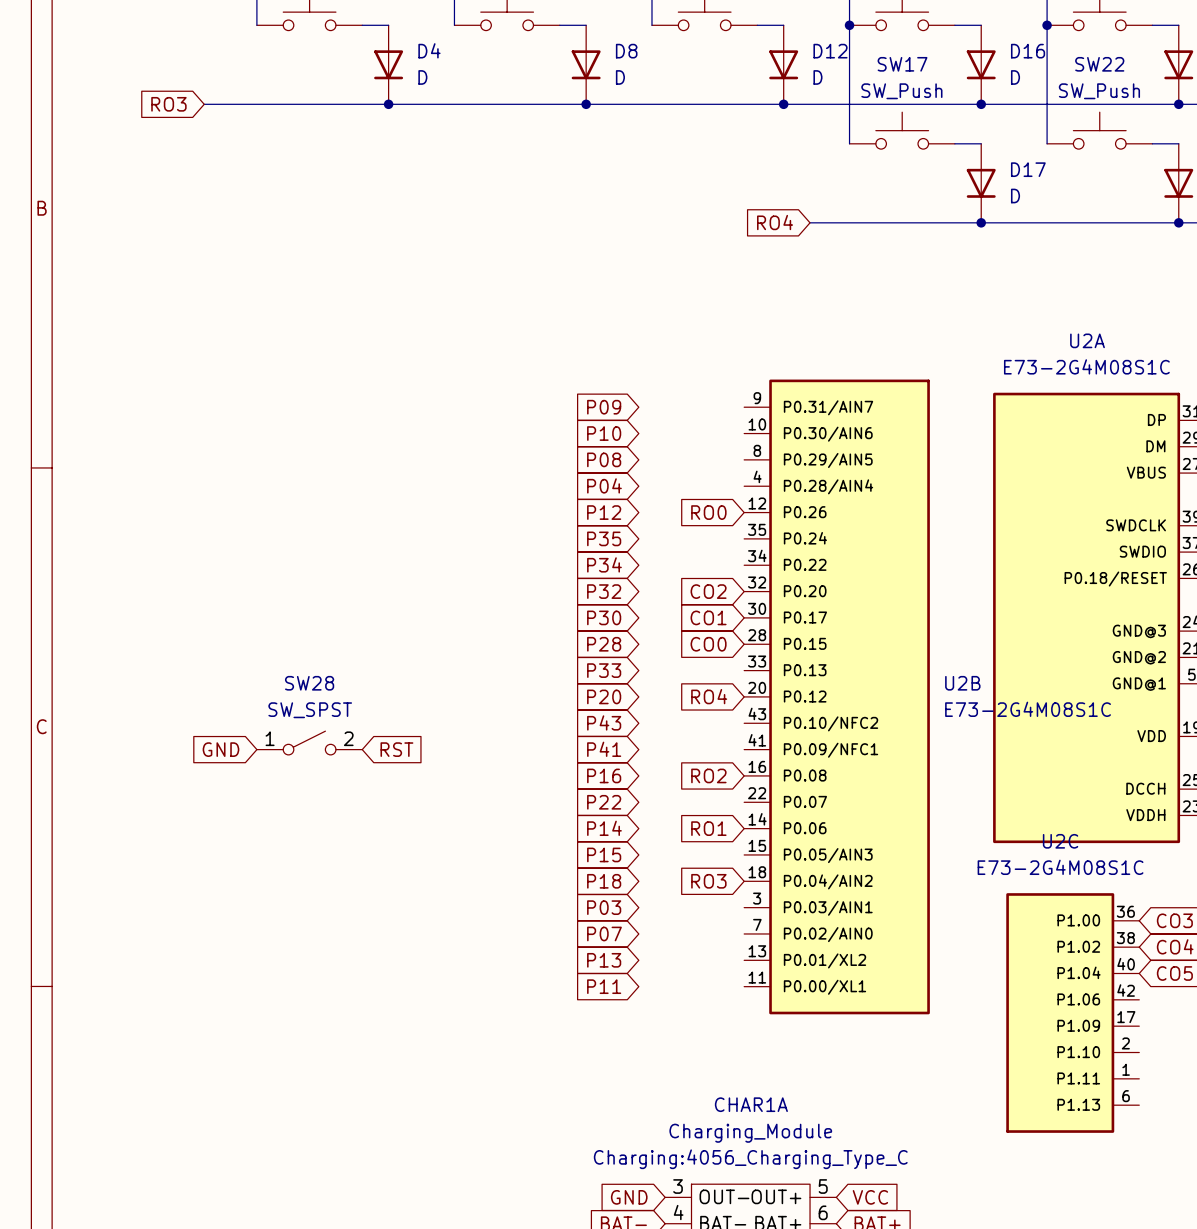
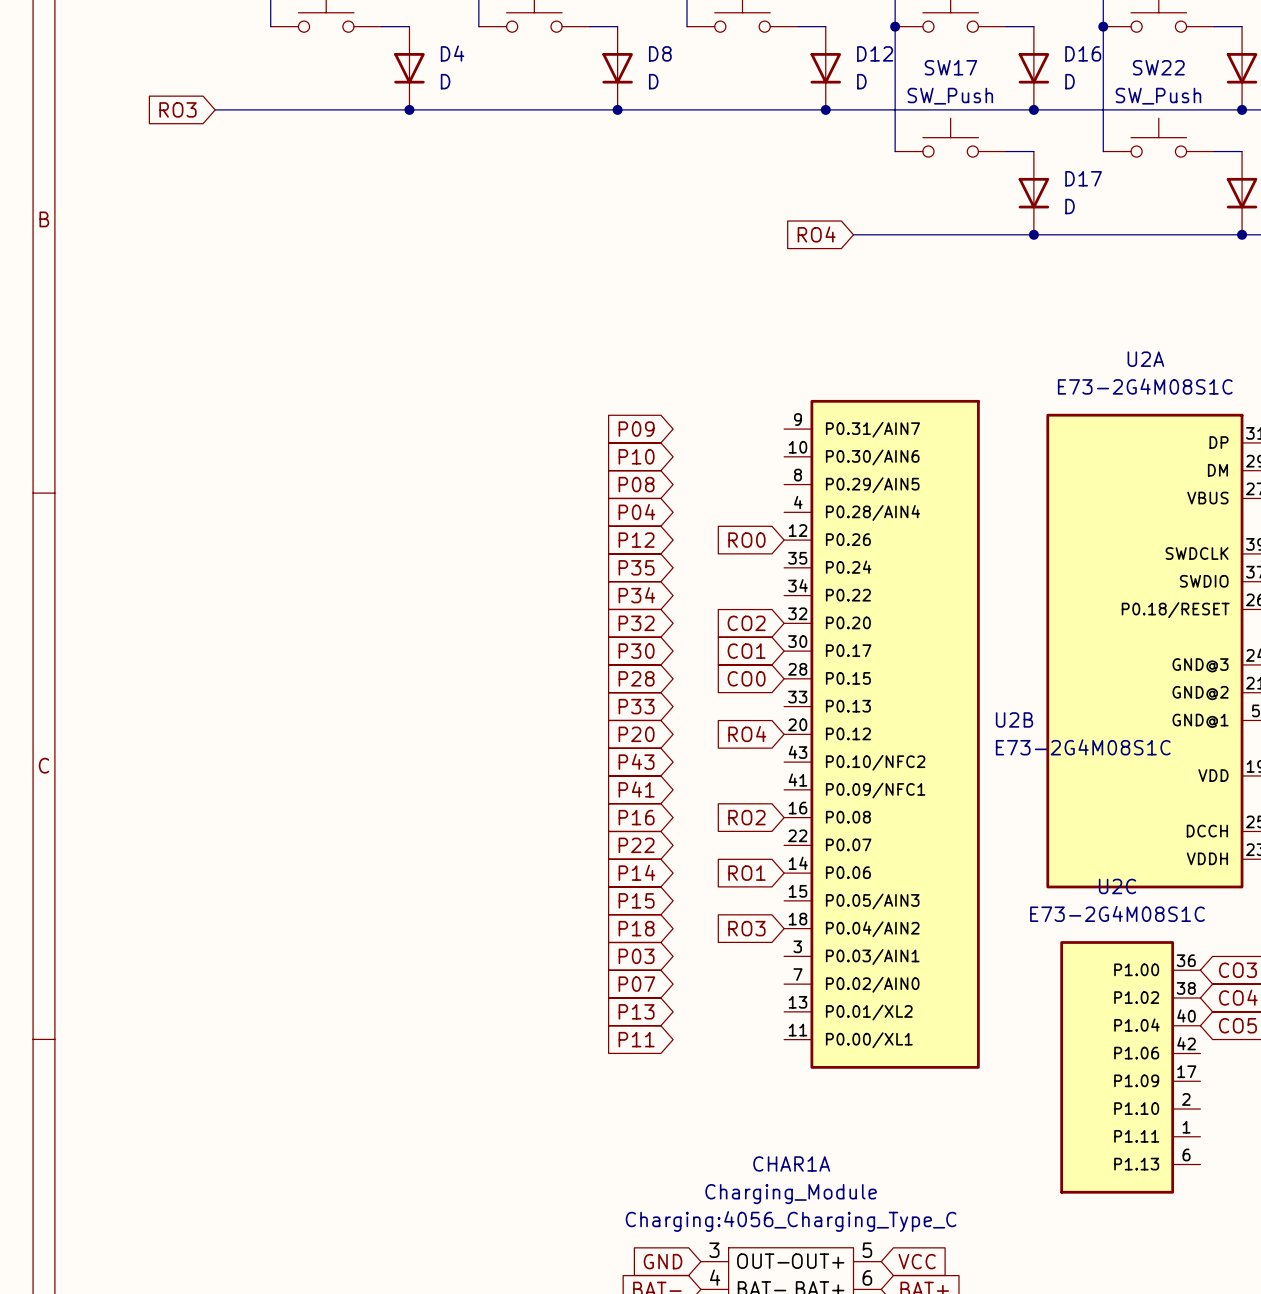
SW28: SW_SPST (309, 743) -> none
global label: GND (220, 749) -> none
global label: RST (396, 749) -> none

